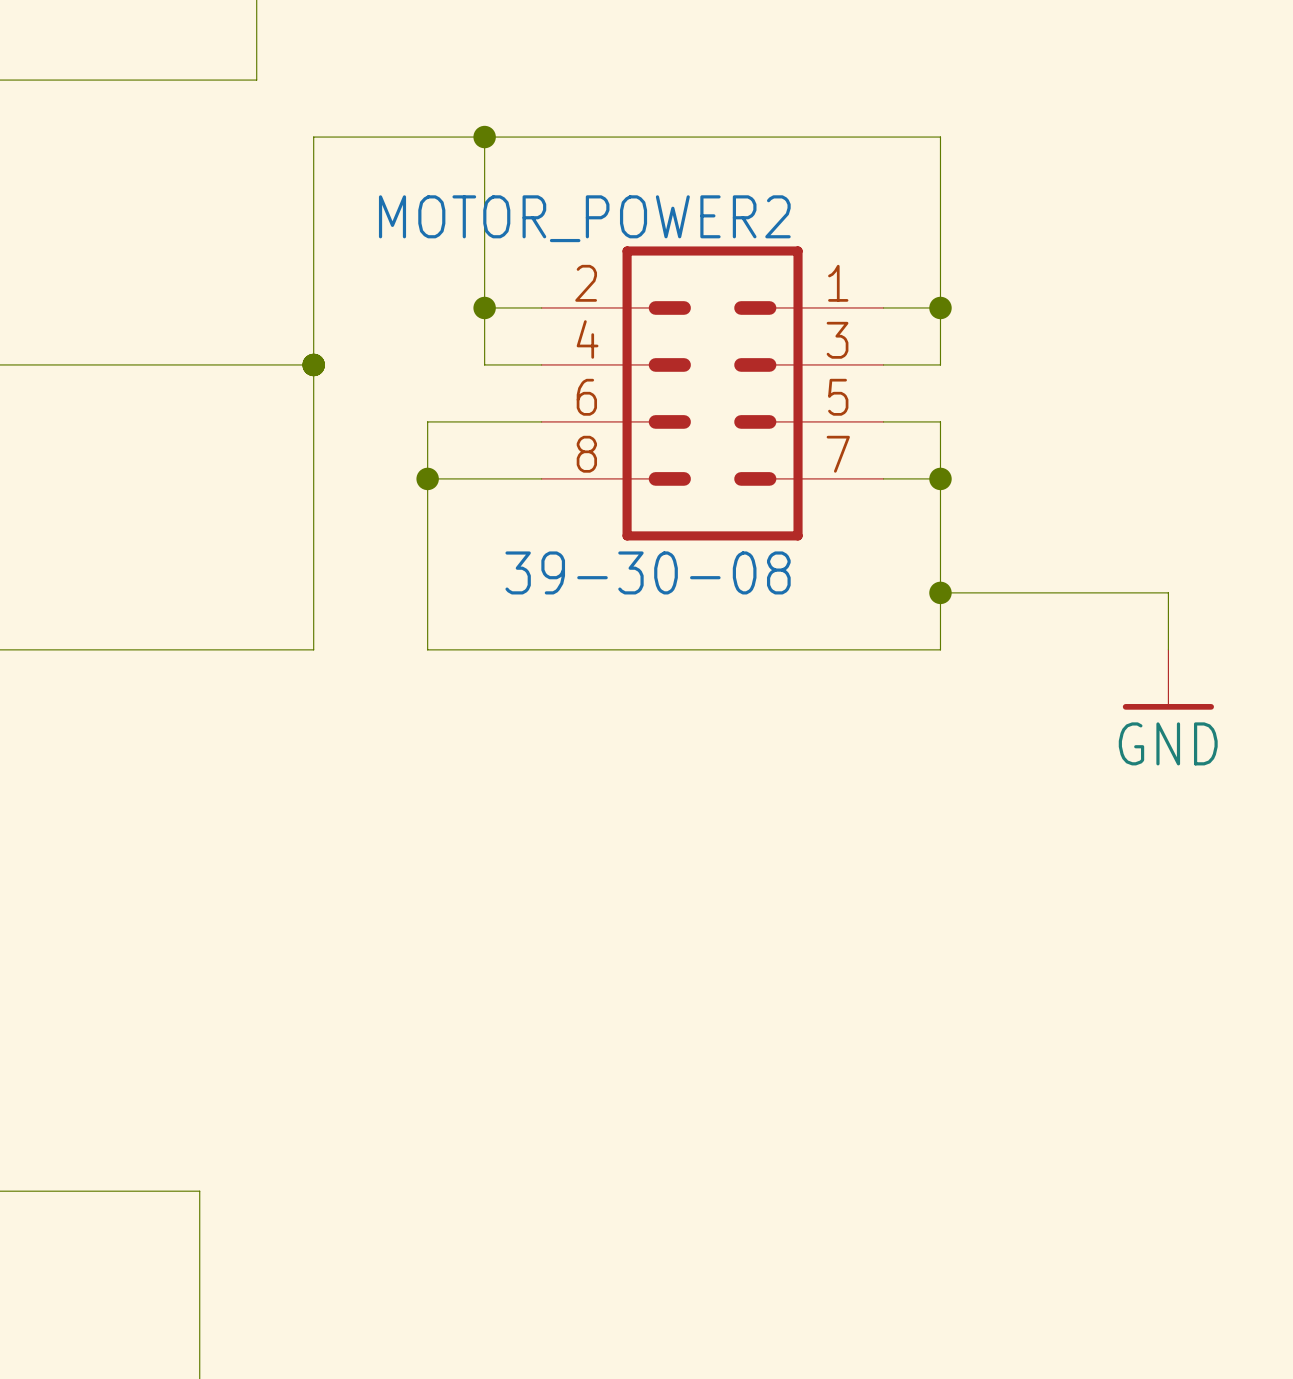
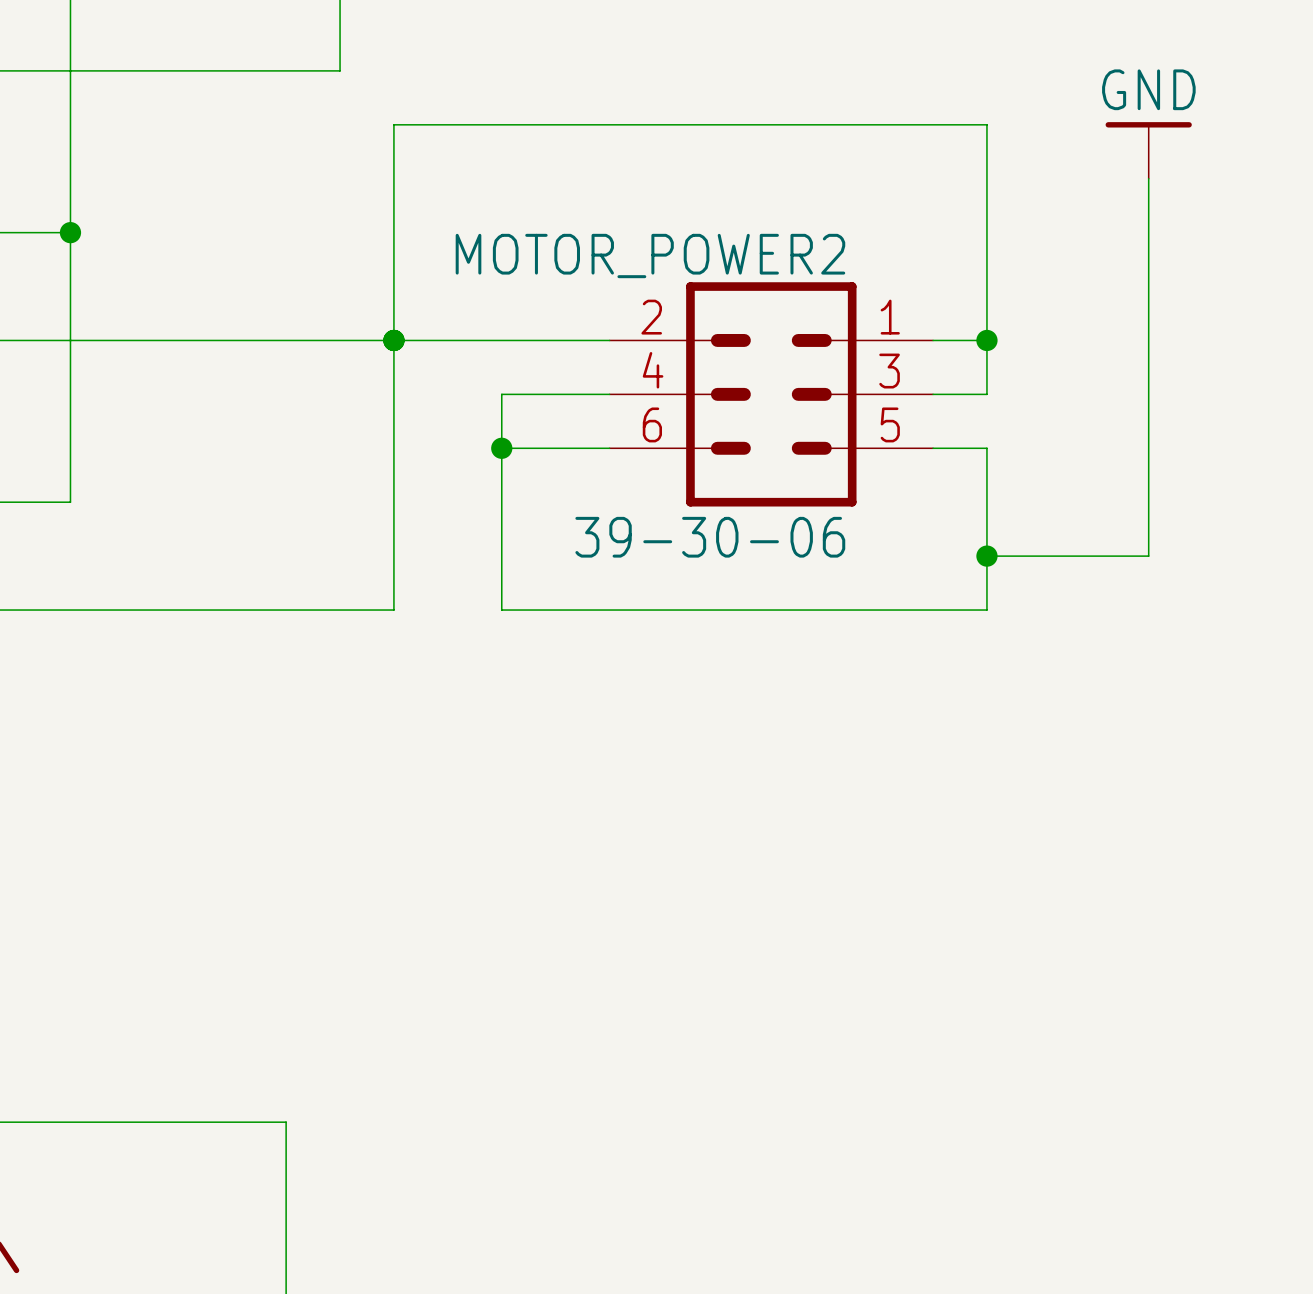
wire: (484, 137) (484, 364) -> (393, 340) (555, 340)
junction: (484, 137) -> none
MOTOR_POWER2 symbol: [541, 246, 884, 541] -> [609, 282, 934, 507]
wire: (484, 307) (541, 307) -> none
junction: (484, 307) -> none
wire: (883, 307) (940, 307) -> none
junction: (940, 307) -> none
junction: none -> (986, 340)
wire: (940, 421) (940, 478) -> (986, 394) (986, 340)
junction: (940, 478) -> none
MOTOR_POWER2 value: 39-30-08 (648, 572) -> 39-30-06 (710, 537)
wire: (1111, 592) (1168, 592) (1168, 649) -> (1148, 556) (1148, 178)
power symbol position: GND (1168, 679) -> GND (1148, 150)
power symbol rotation: 0° (1168, 706) -> 180° (1148, 124)

